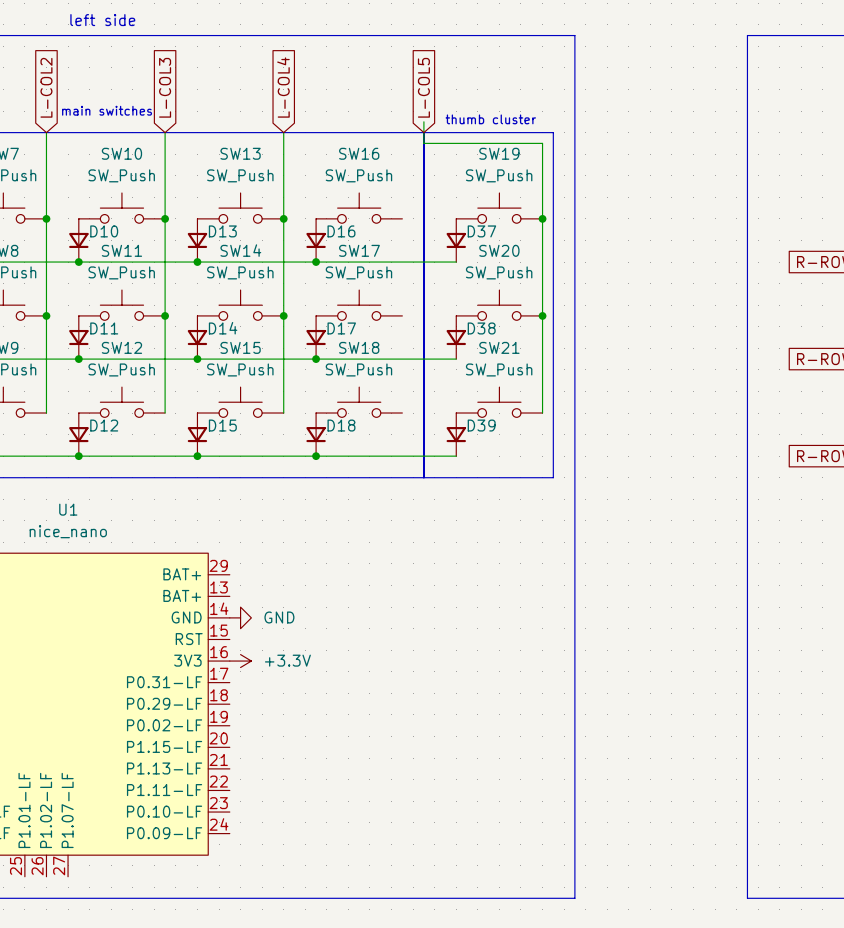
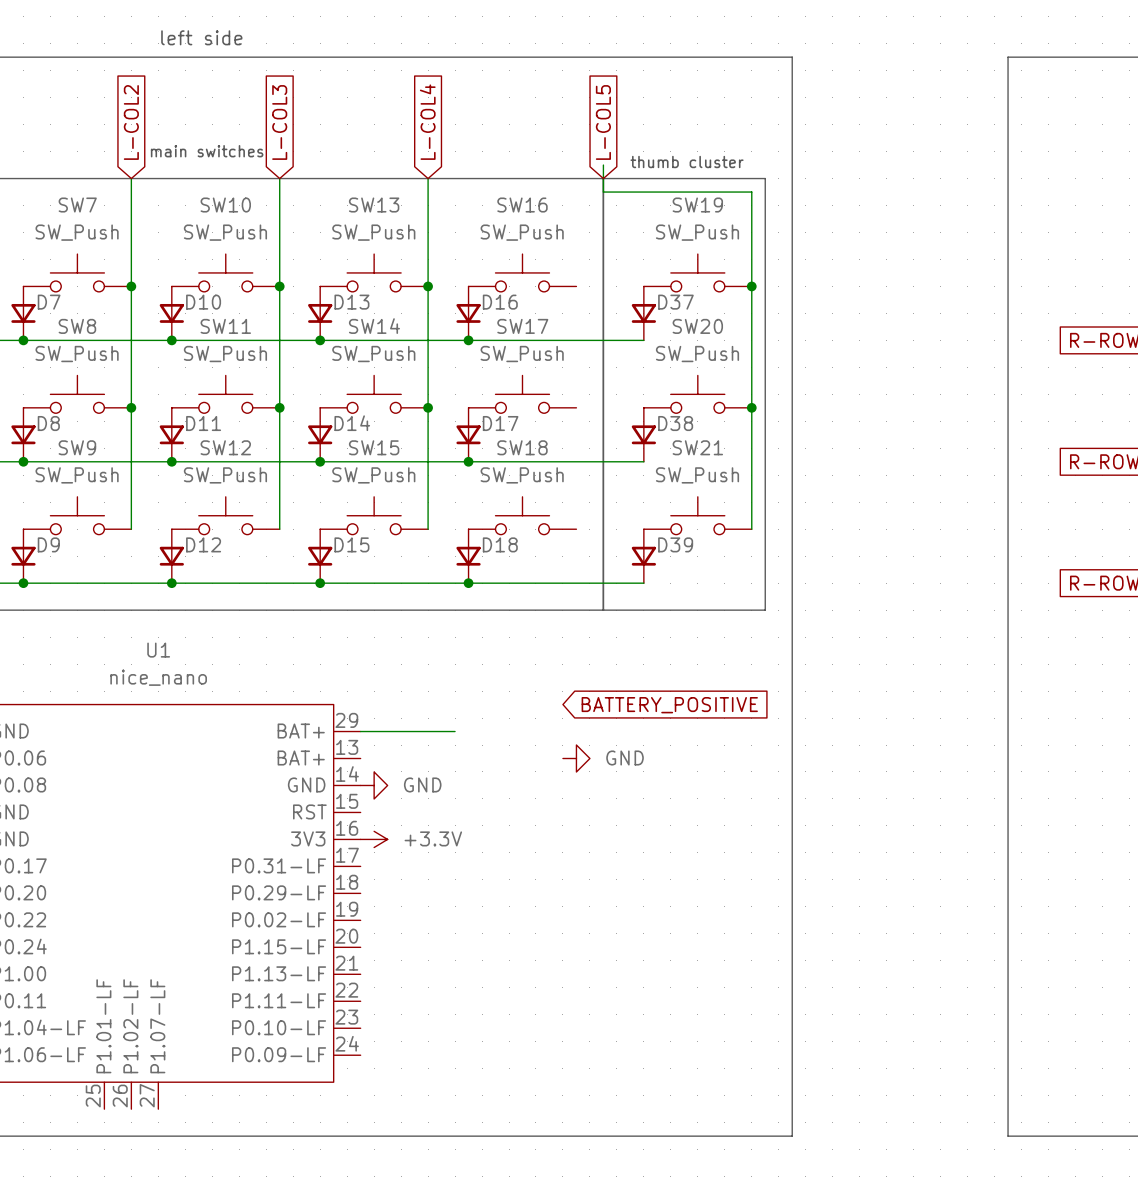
global label: none -> BATTERY_POSITIVE (669, 705)
wire: none -> (360, 731) (455, 731)
power symbol: none -> GND (576, 758)

